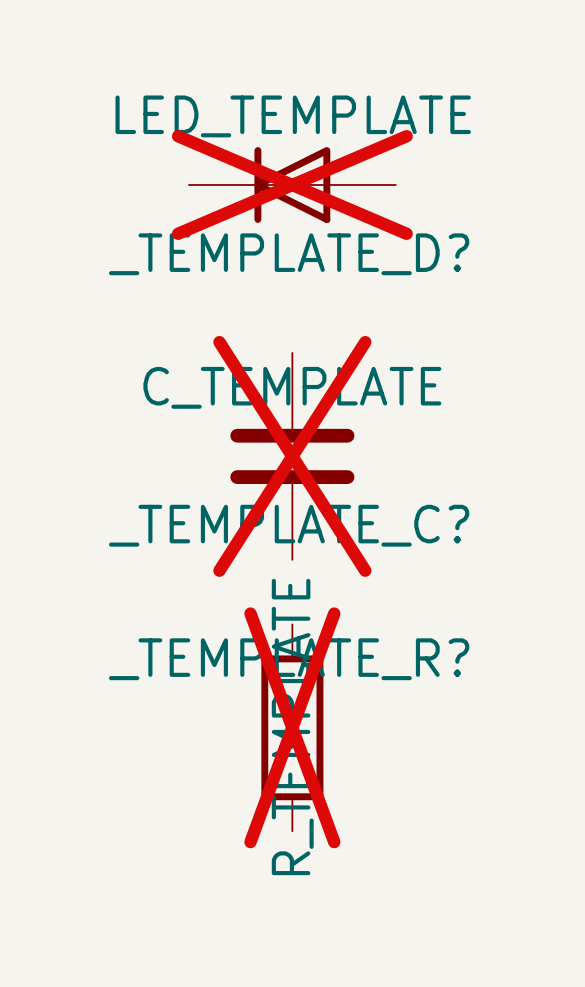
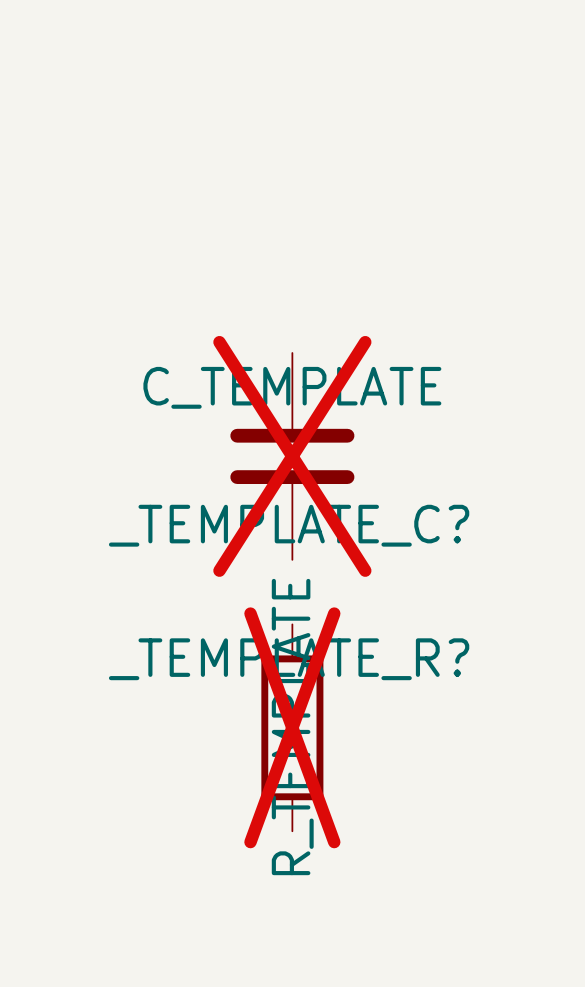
_TEMPLATE_D?: LED_TEMPLATE (292, 185) -> none

